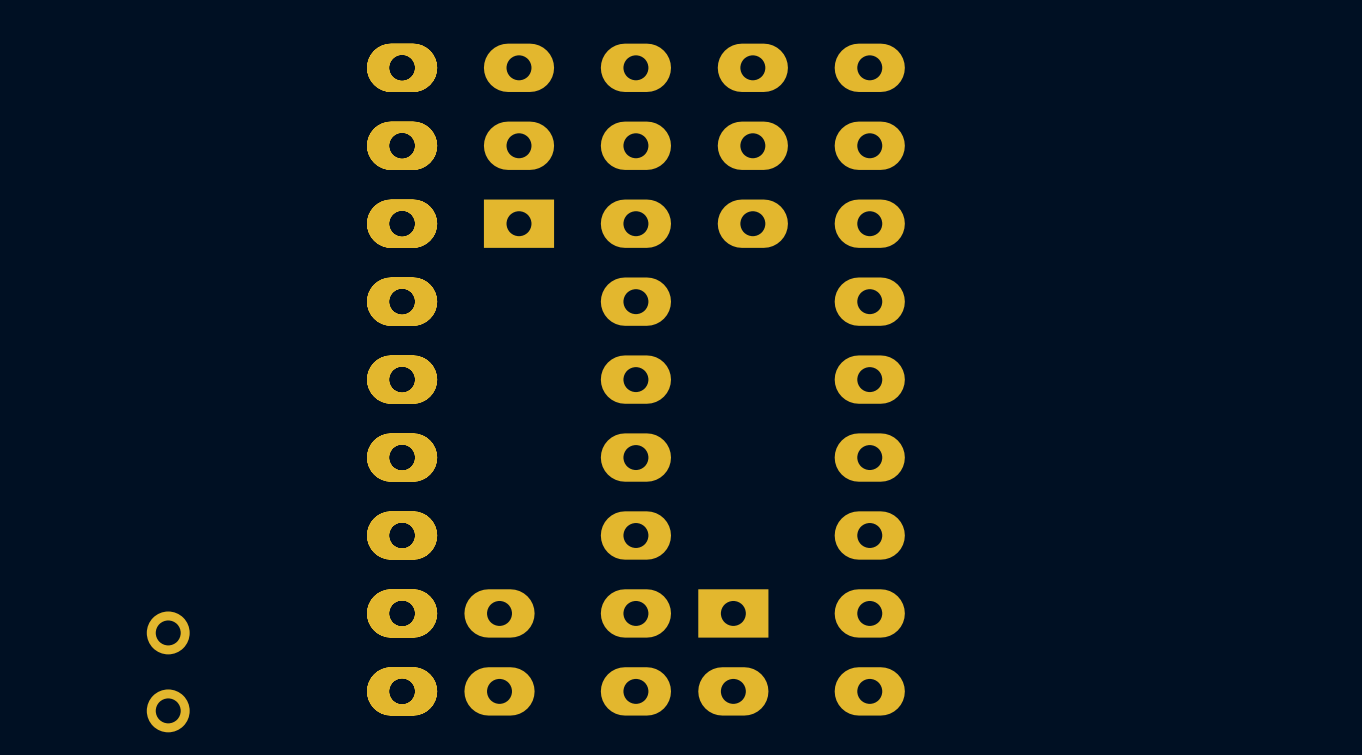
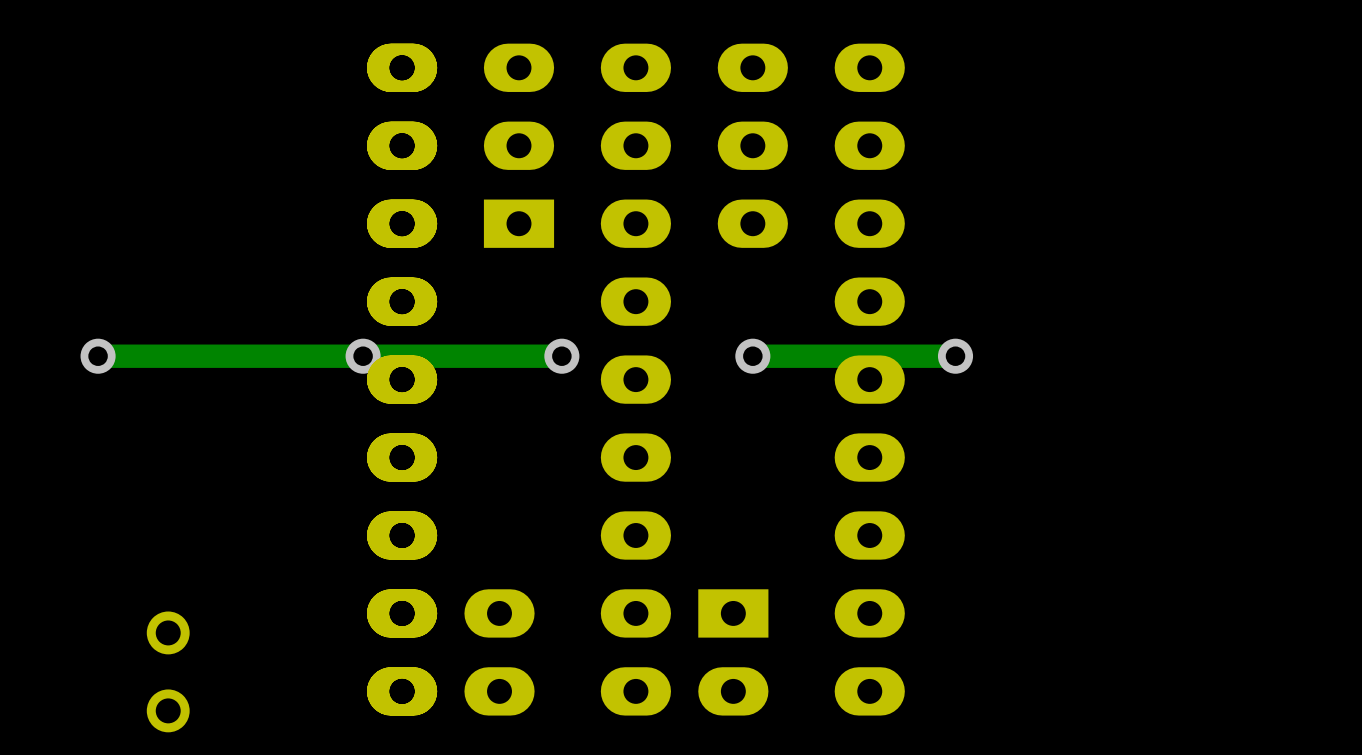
via: none -> (98, 356)
via: none -> (363, 356)
track: none -> (561, 356) (98, 356)
via: none -> (561, 356)
via: none -> (752, 356)
track: none -> (955, 356) (752, 356)
via: none -> (955, 356)

